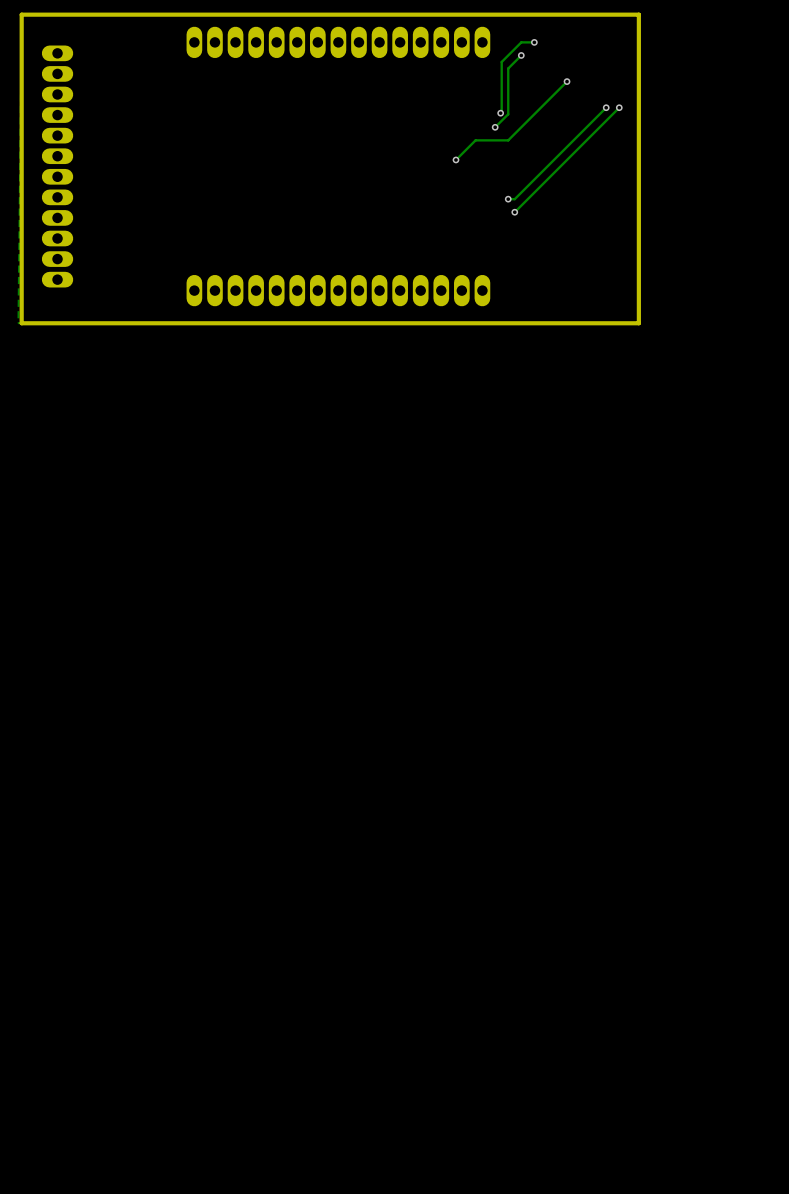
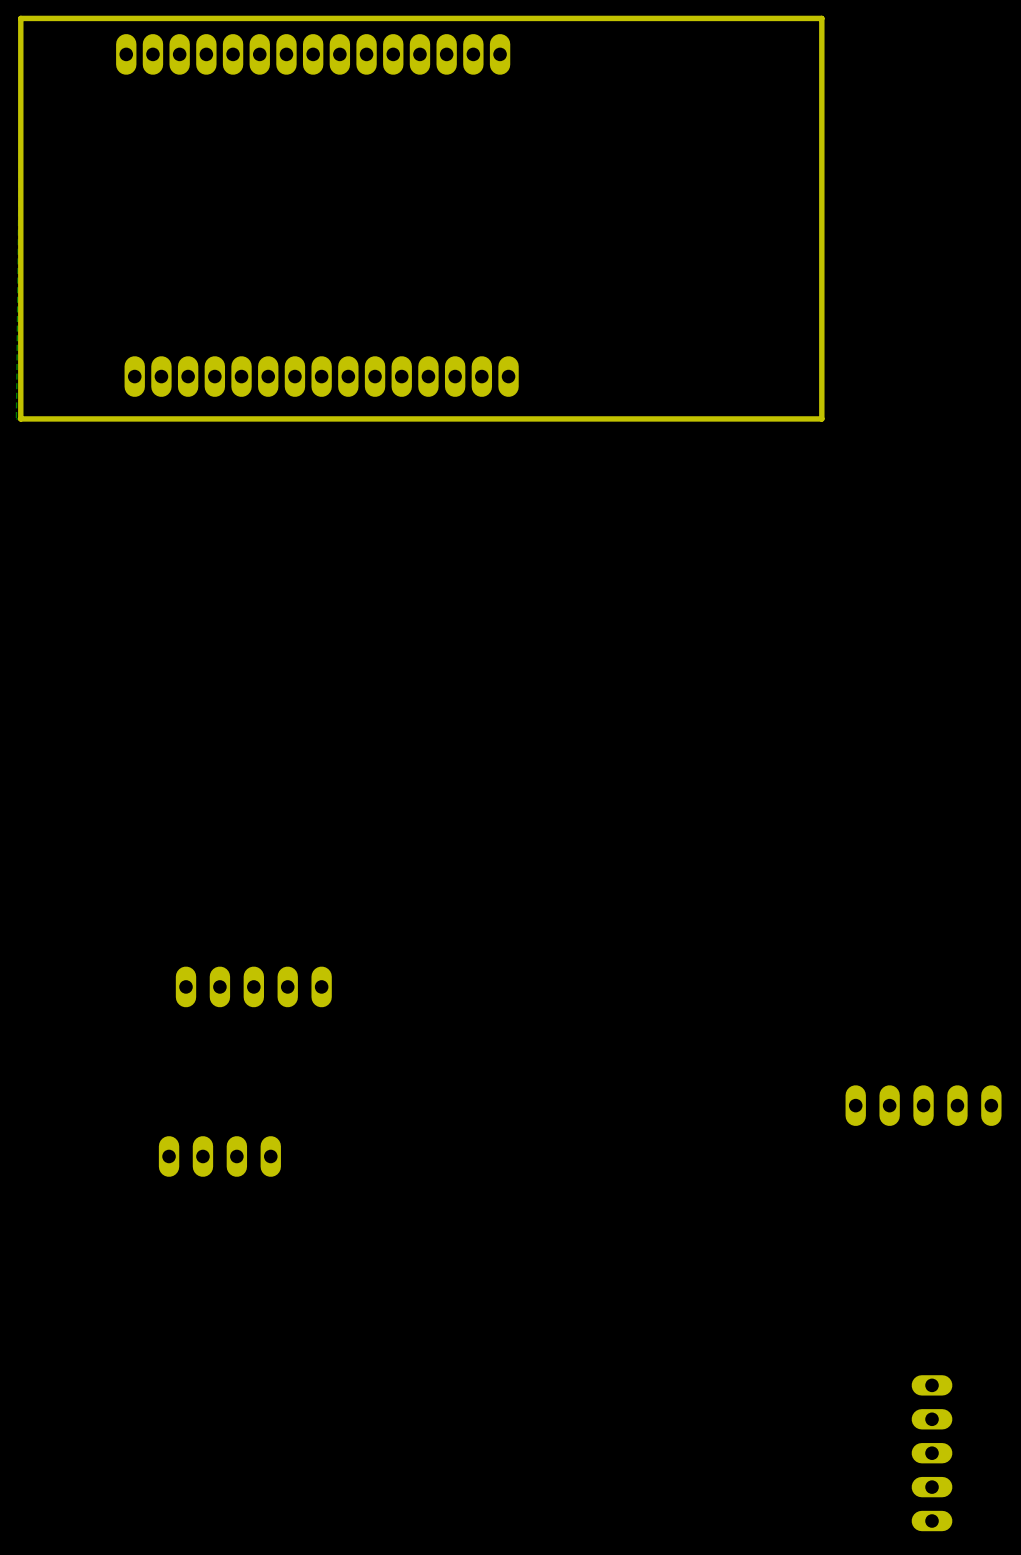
part position: (338, 42) -> (313, 54)
track: (534, 42) (521, 42) (501, 61) (500, 113) -> none
via: (534, 42) -> none
track: (521, 55) (508, 68) (508, 114) (495, 127) -> none
via: (521, 55) -> none
track: (567, 81) (508, 140) (475, 140) (455, 159) -> none
via: (567, 81) -> none
track: (606, 107) (514, 199) (508, 199) -> none
via: (606, 107) -> none
track: (619, 107) (514, 212) -> none
via: (619, 107) -> none
via: (500, 113) -> none
via: (495, 127) -> none
via: (455, 159) -> none
part: (57, 166) -> none
via: (508, 199) -> none
via: (514, 212) -> none
part position: (338, 290) -> (321, 376)
part: none -> (253, 986)
part: none -> (923, 1105)
part: none -> (219, 1156)
part: none -> (932, 1453)

